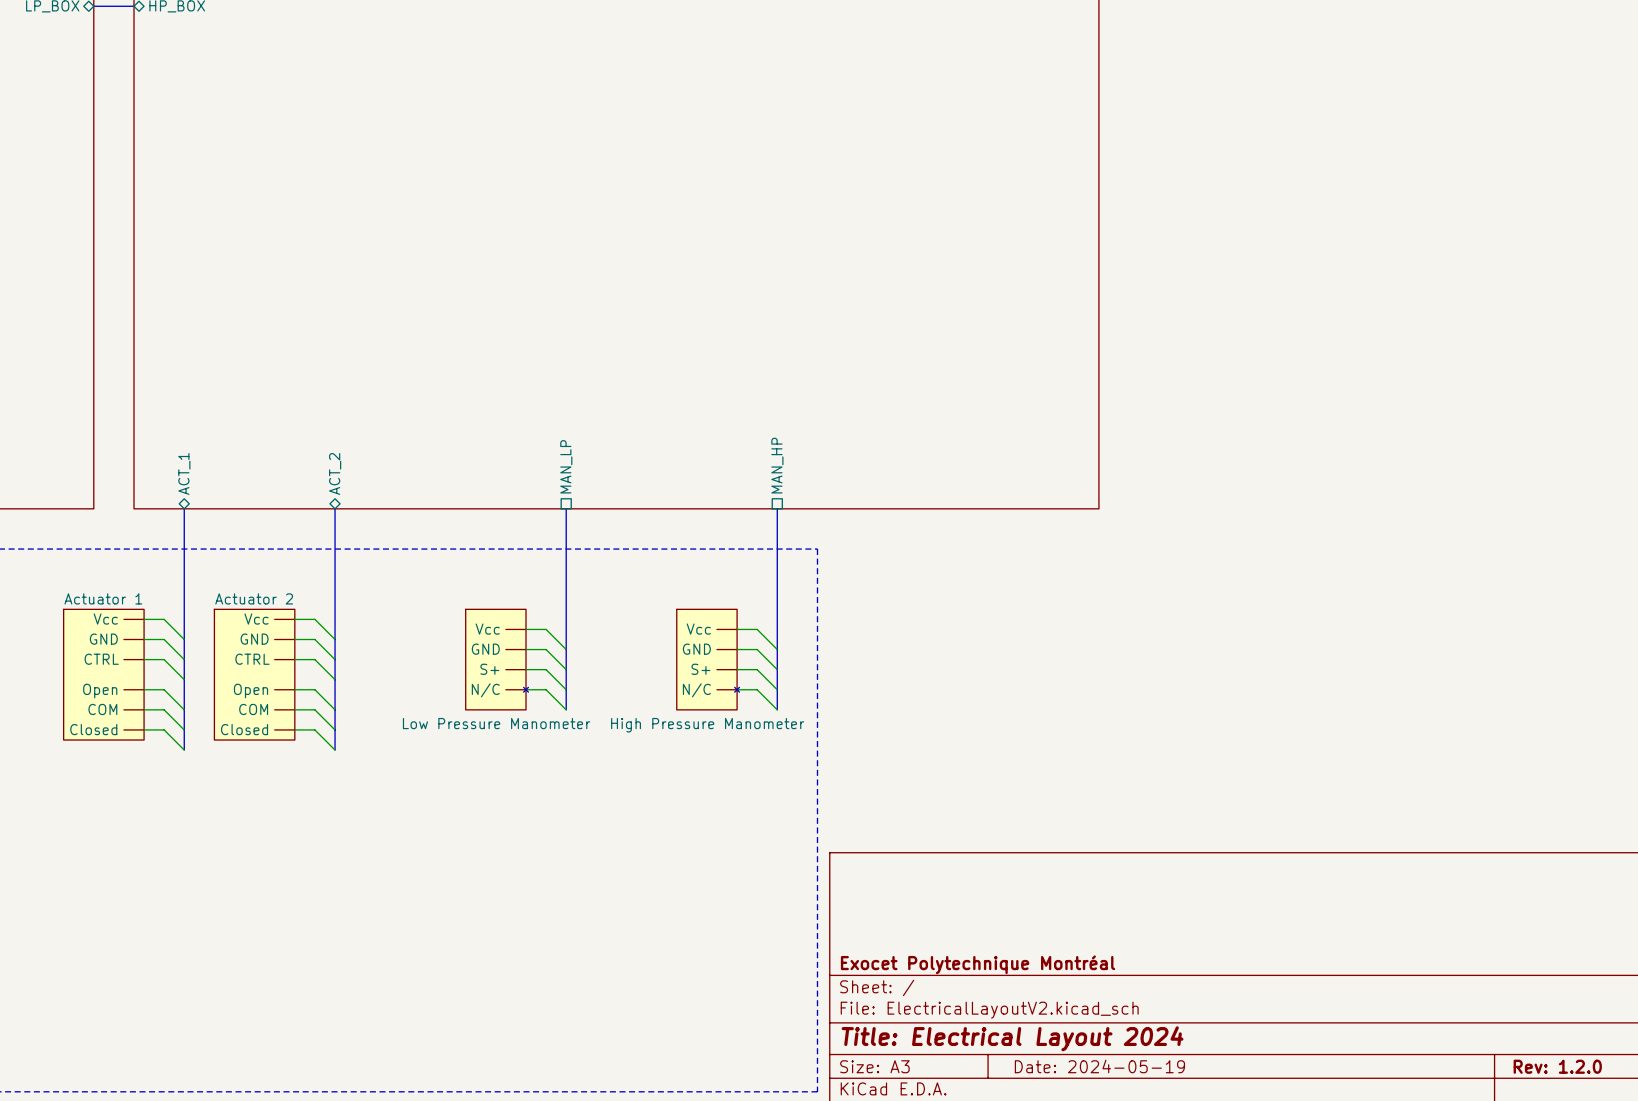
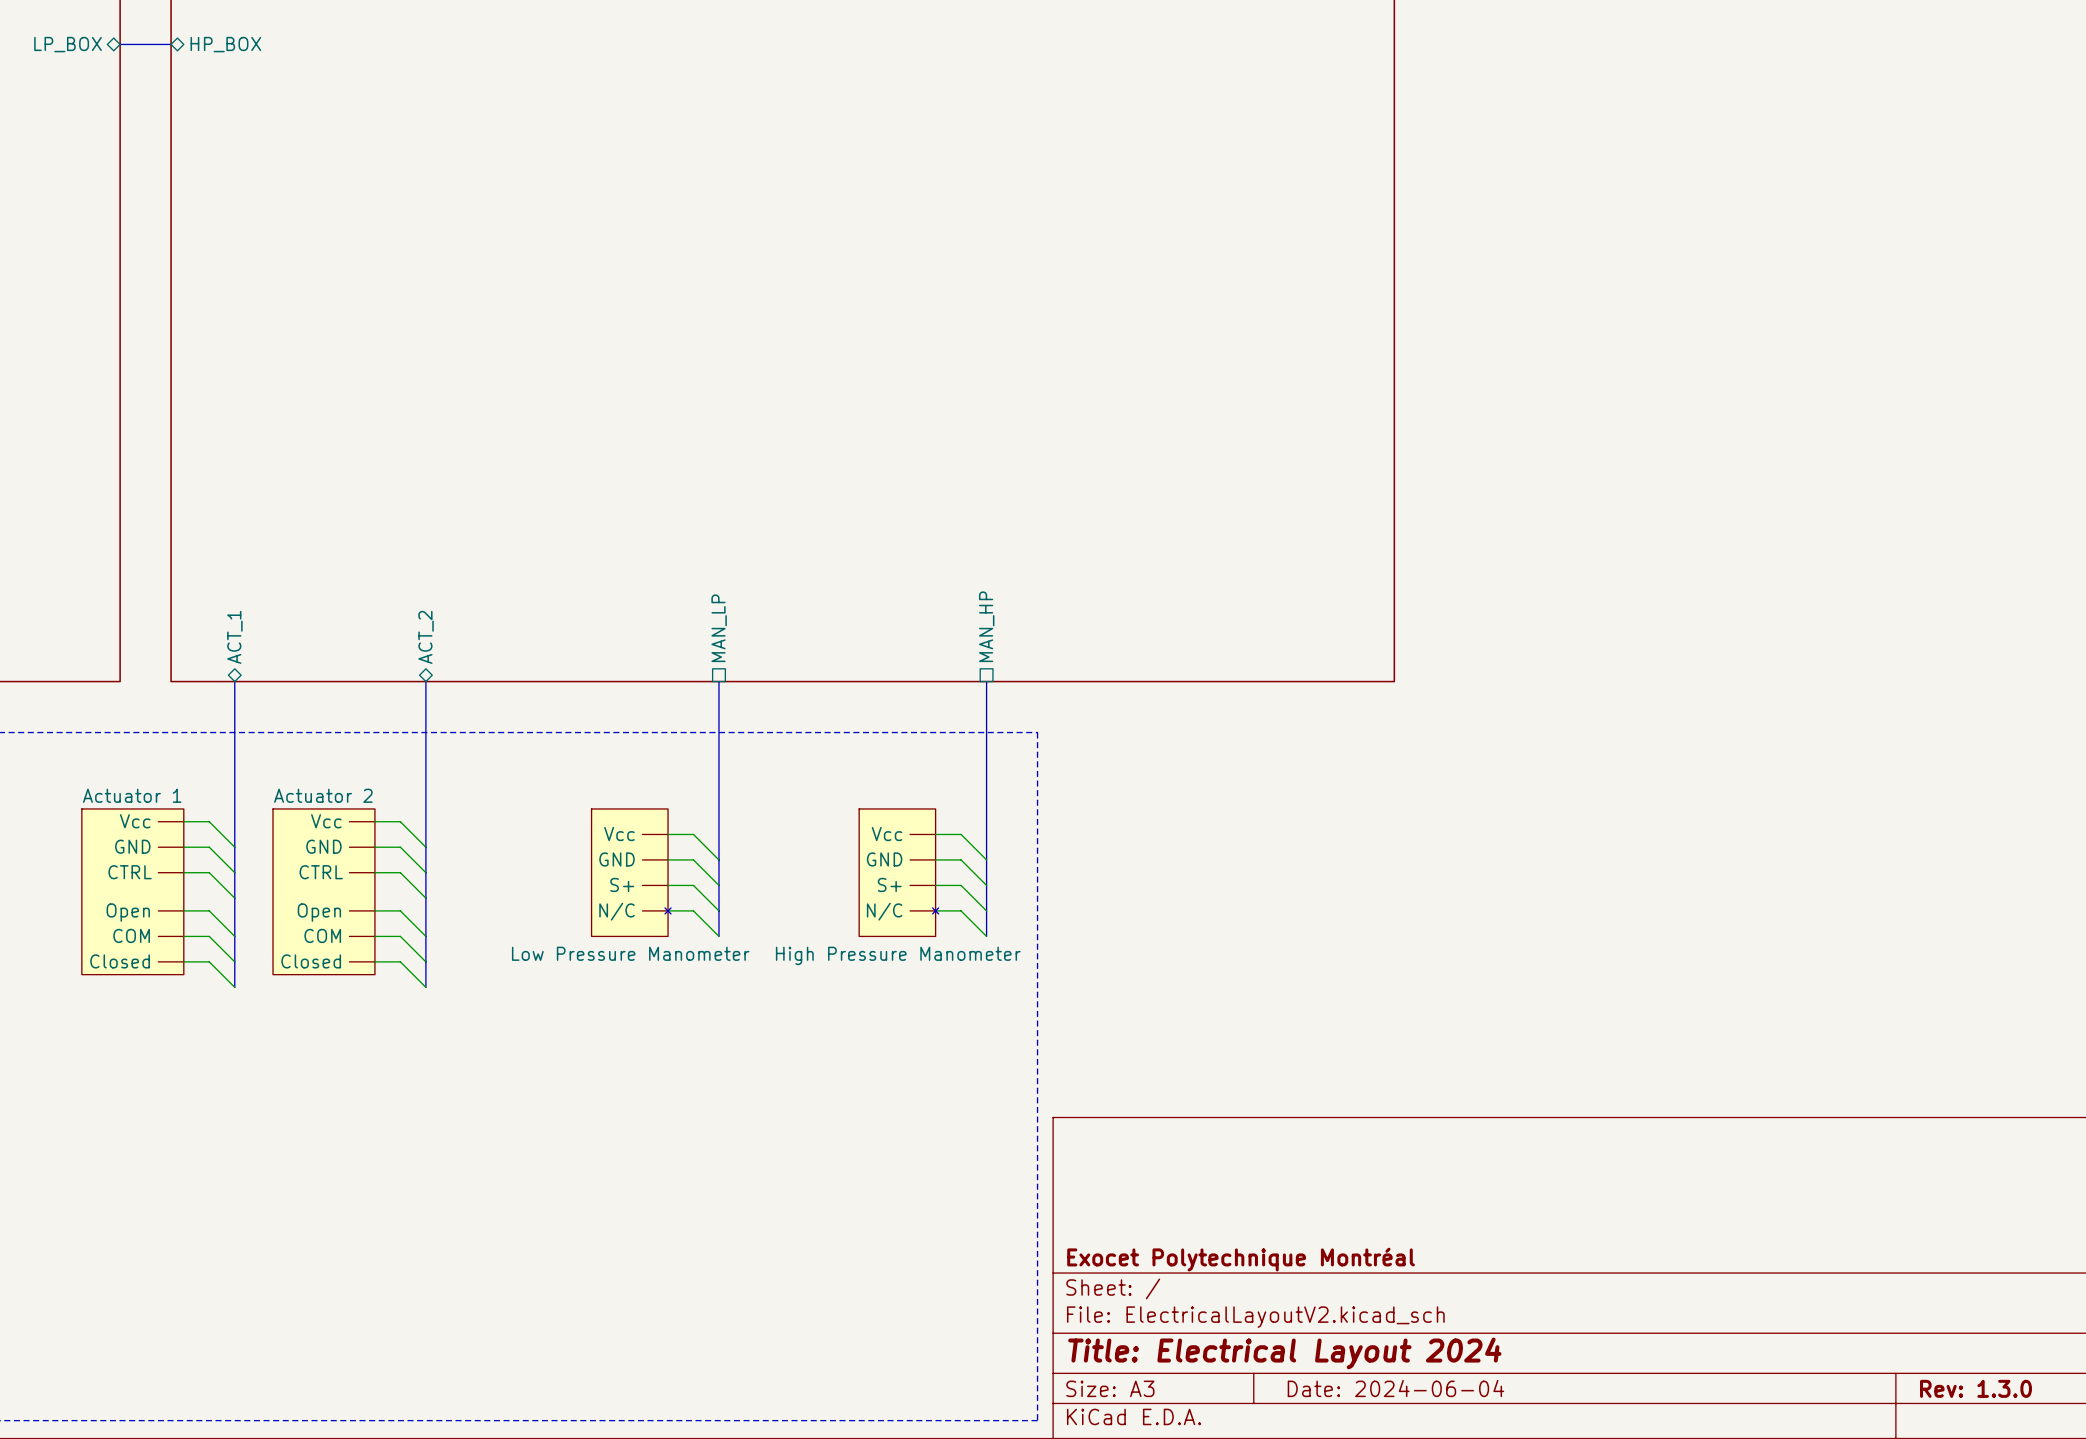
title block: Date: 2024-05-19 (1099, 1066) -> Date: 2024-06-04 (1395, 1388)
title block: Rev: 1.2.0 (1557, 1066) -> Rev: 1.3.0 (1975, 1388)

